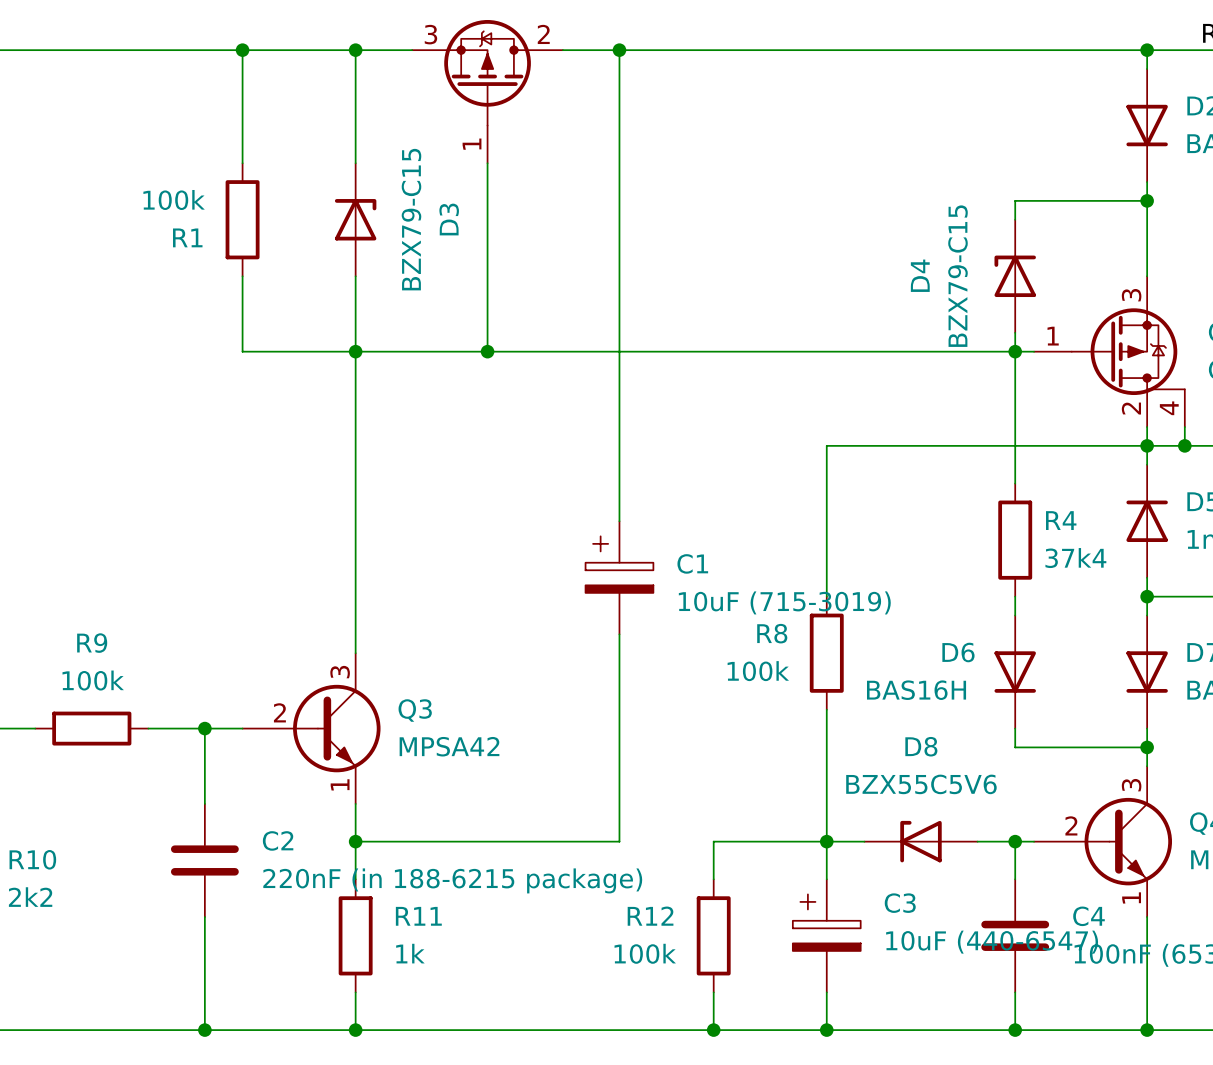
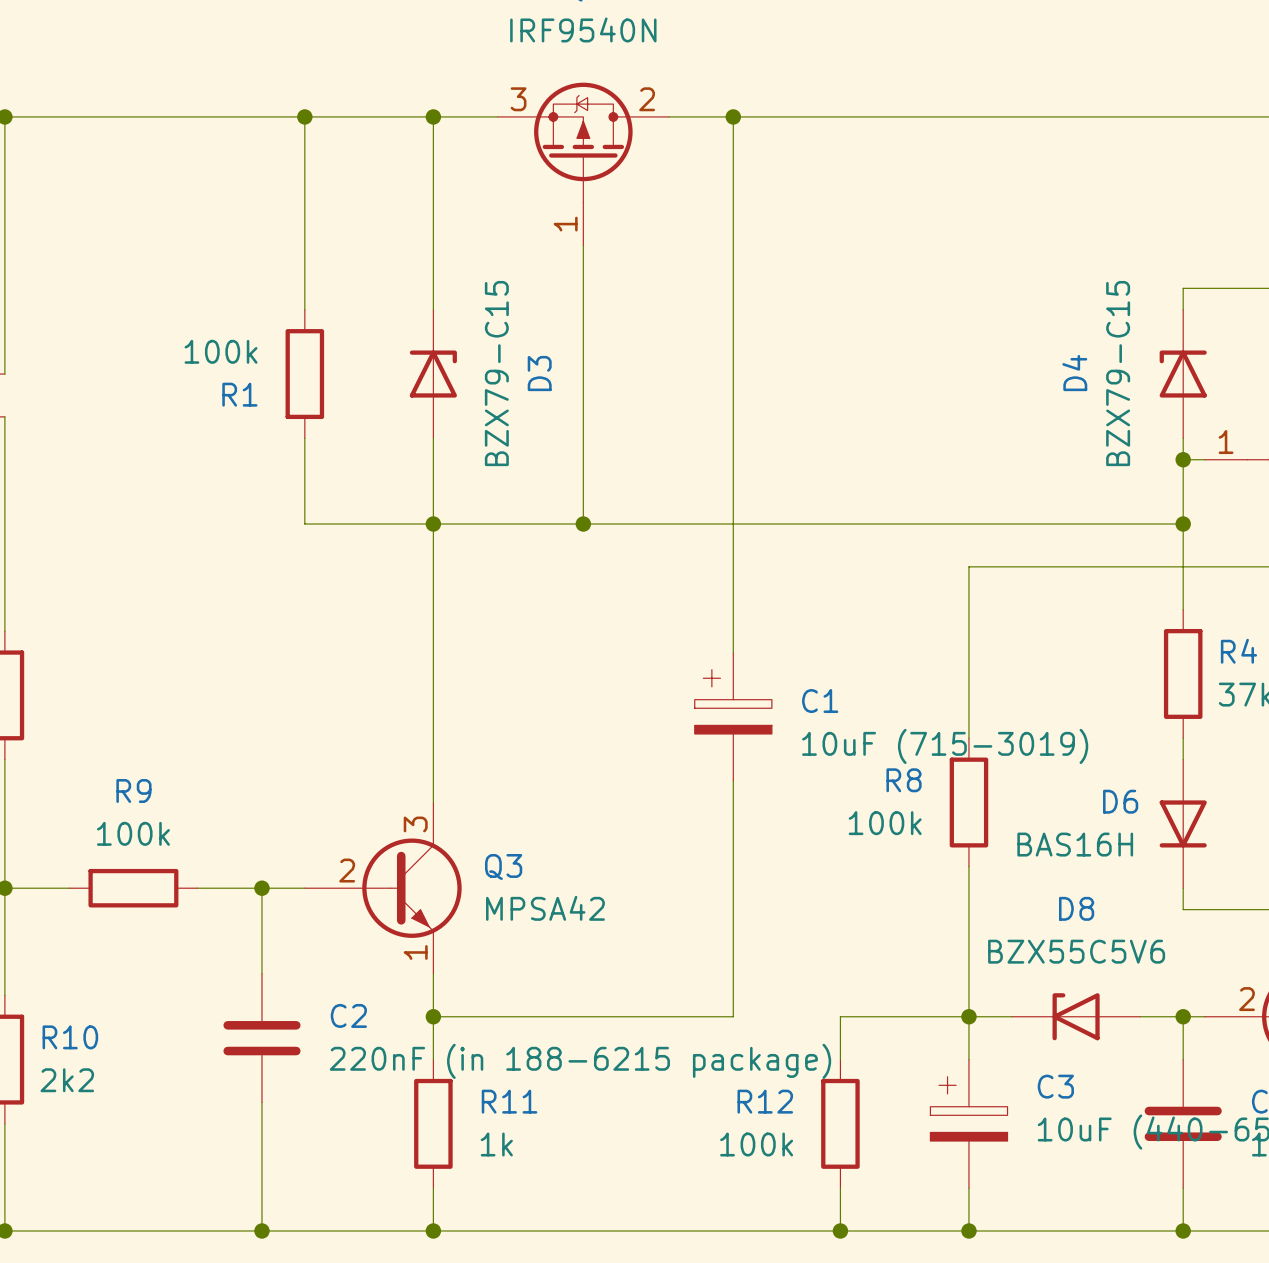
R1 position: (242, 219) -> (304, 374)
D3 position: (355, 219) -> (433, 374)
wire: (242, 276) (242, 332) -> (304, 245) (304, 309)
wire: (242, 351) (1015, 351) -> (304, 459) (304, 524) (1183, 524)
junction position: (355, 351) -> (433, 524)
wire: none -> (583, 459) (583, 524)
junction position: (487, 351) -> (583, 524)
junction: none -> (1183, 524)

